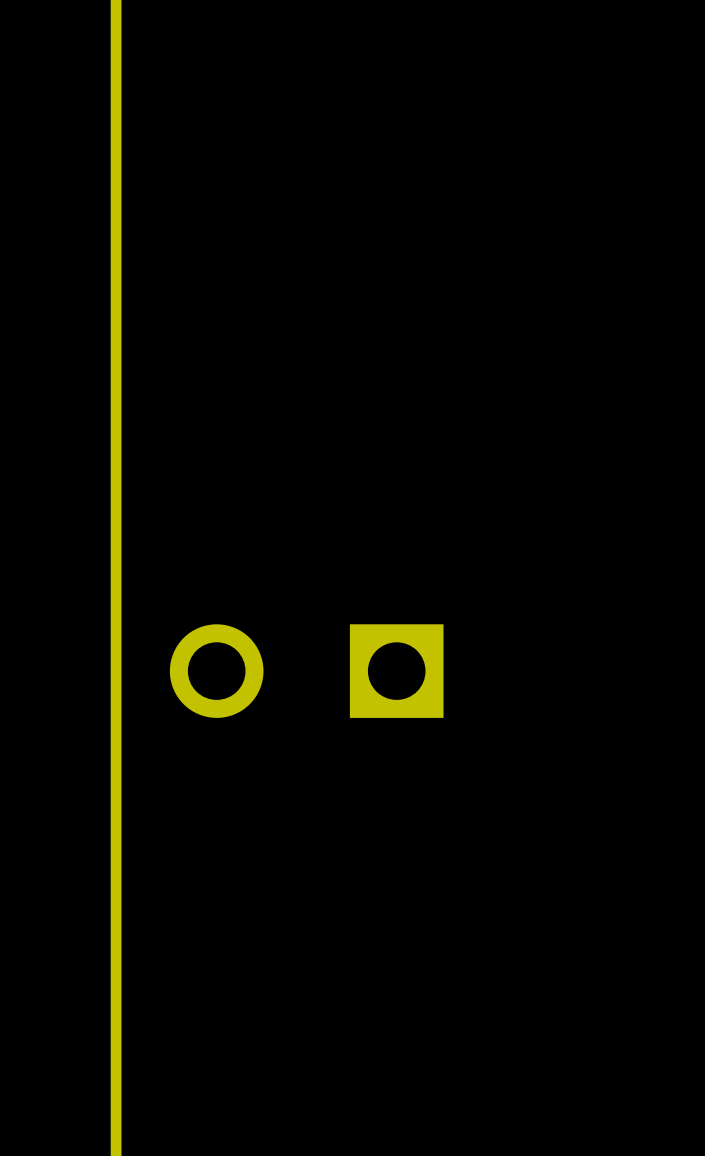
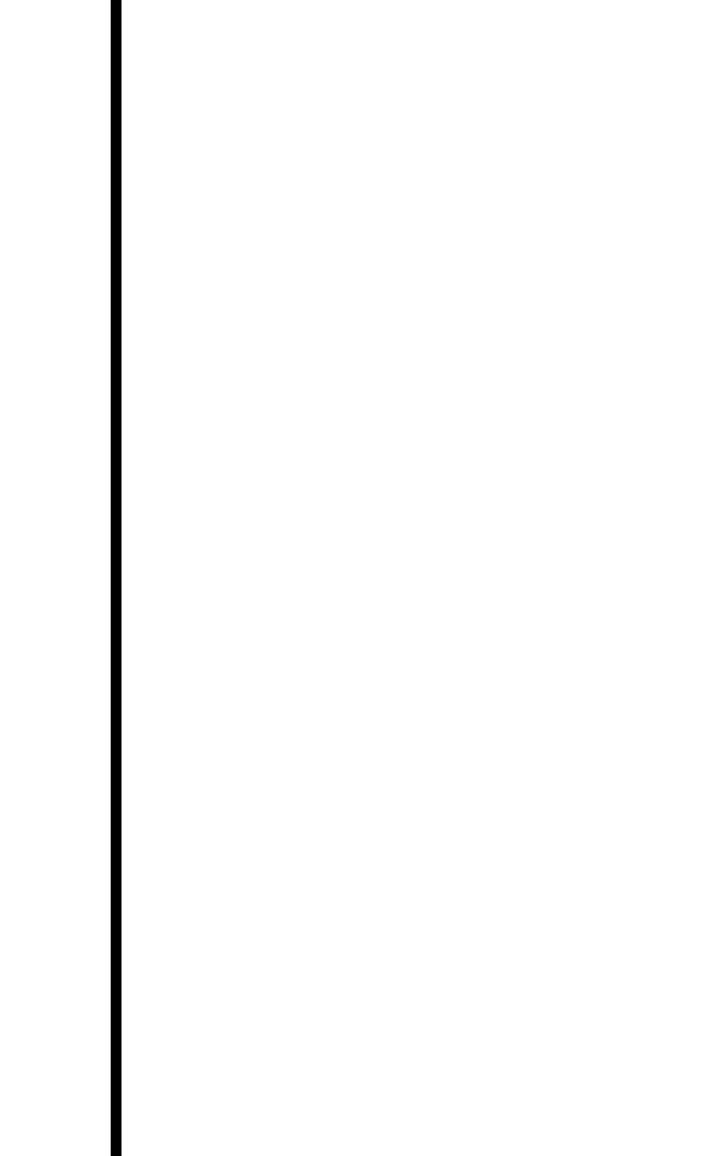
part: (306, 671) -> none

